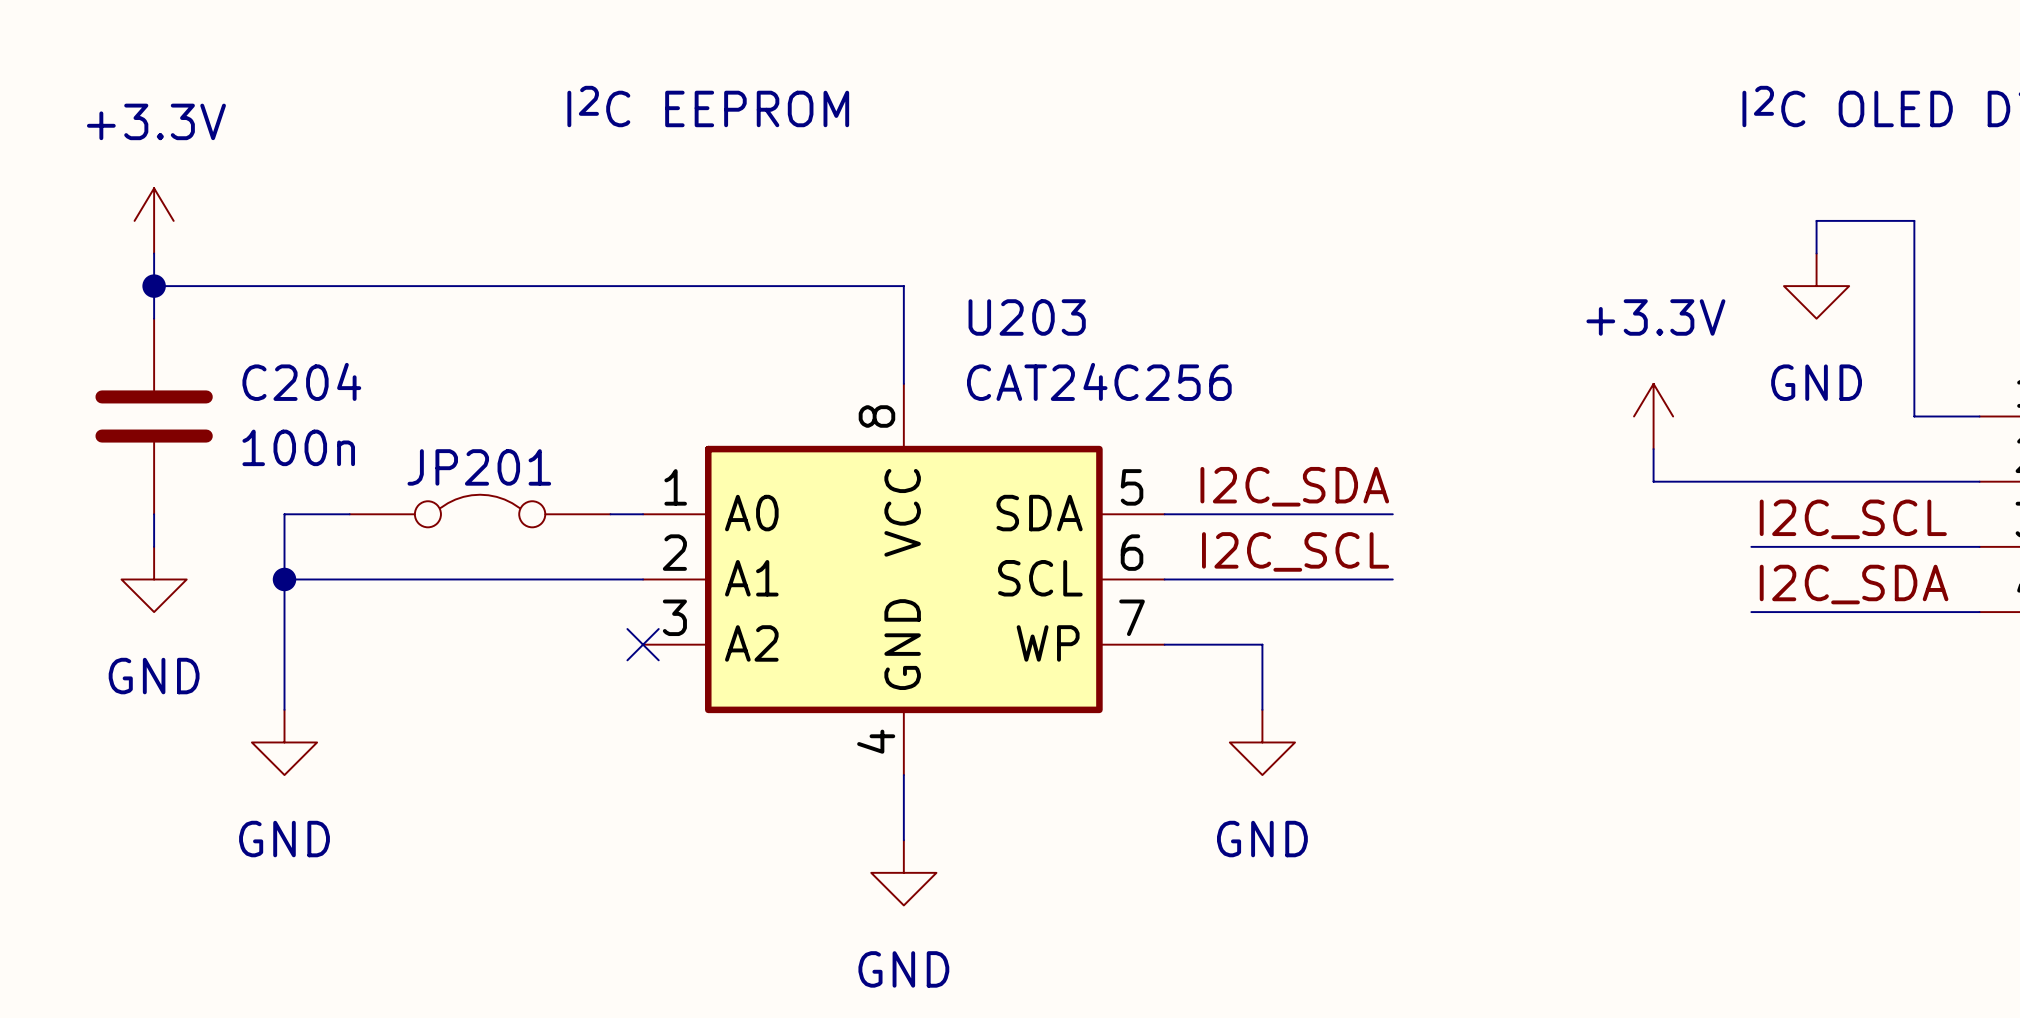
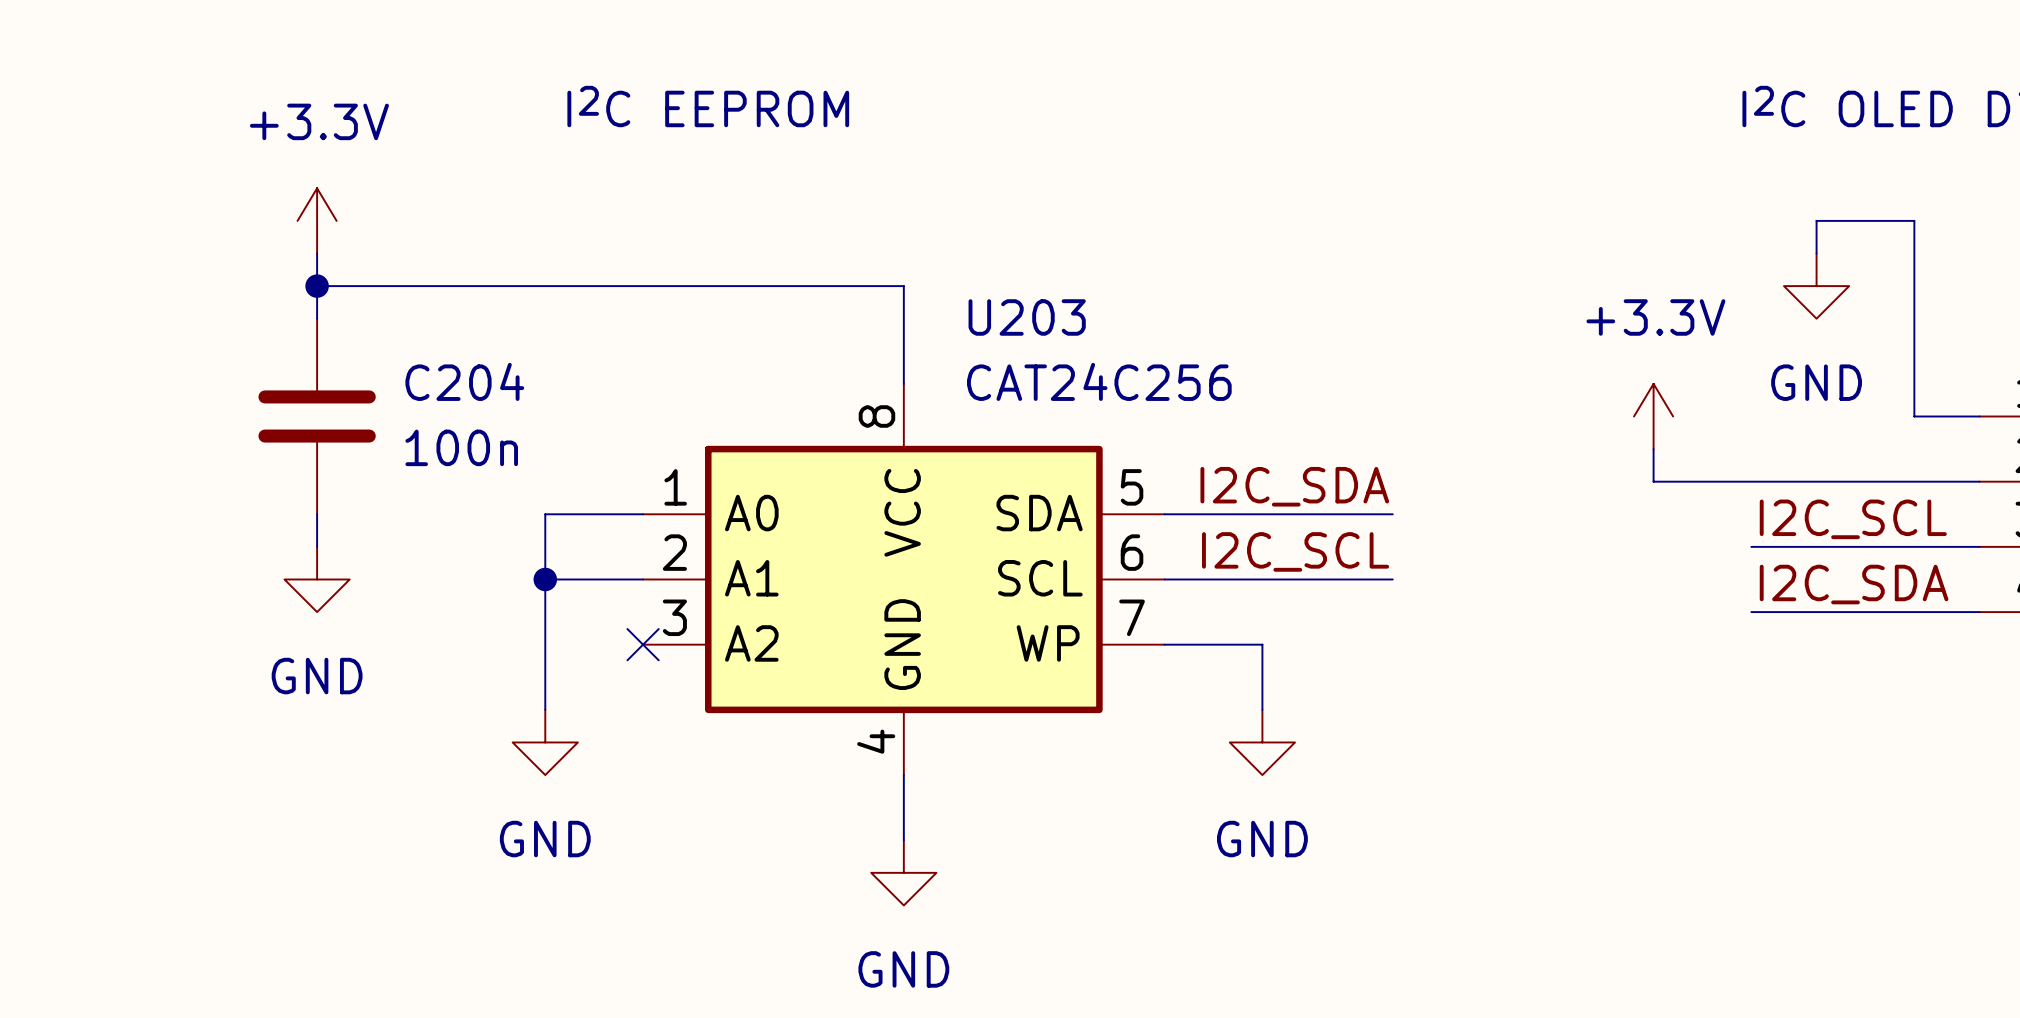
power symbol position: +3.3V (154, 220) -> +3.3V (317, 220)
wire: (154, 253) (154, 318) -> (317, 253) (317, 318)
wire: (154, 286) (317, 286) -> none
junction: (154, 286) -> none
junction: none -> (317, 286)
C204 position: (154, 416) -> (317, 416)
JP201: (480, 511) -> none
wire: (154, 514) (154, 546) -> (317, 514) (317, 546)
wire: (349, 514) (284, 514) (284, 709) -> (610, 514) (545, 514) (545, 709)
power symbol: GND (154, 579) -> none
wire: (284, 579) (545, 579) -> none
junction: (284, 579) -> none
power symbol: none -> GND (317, 579)
junction: none -> (545, 579)
power symbol: GND (284, 742) -> none
power symbol: none -> GND (545, 742)

